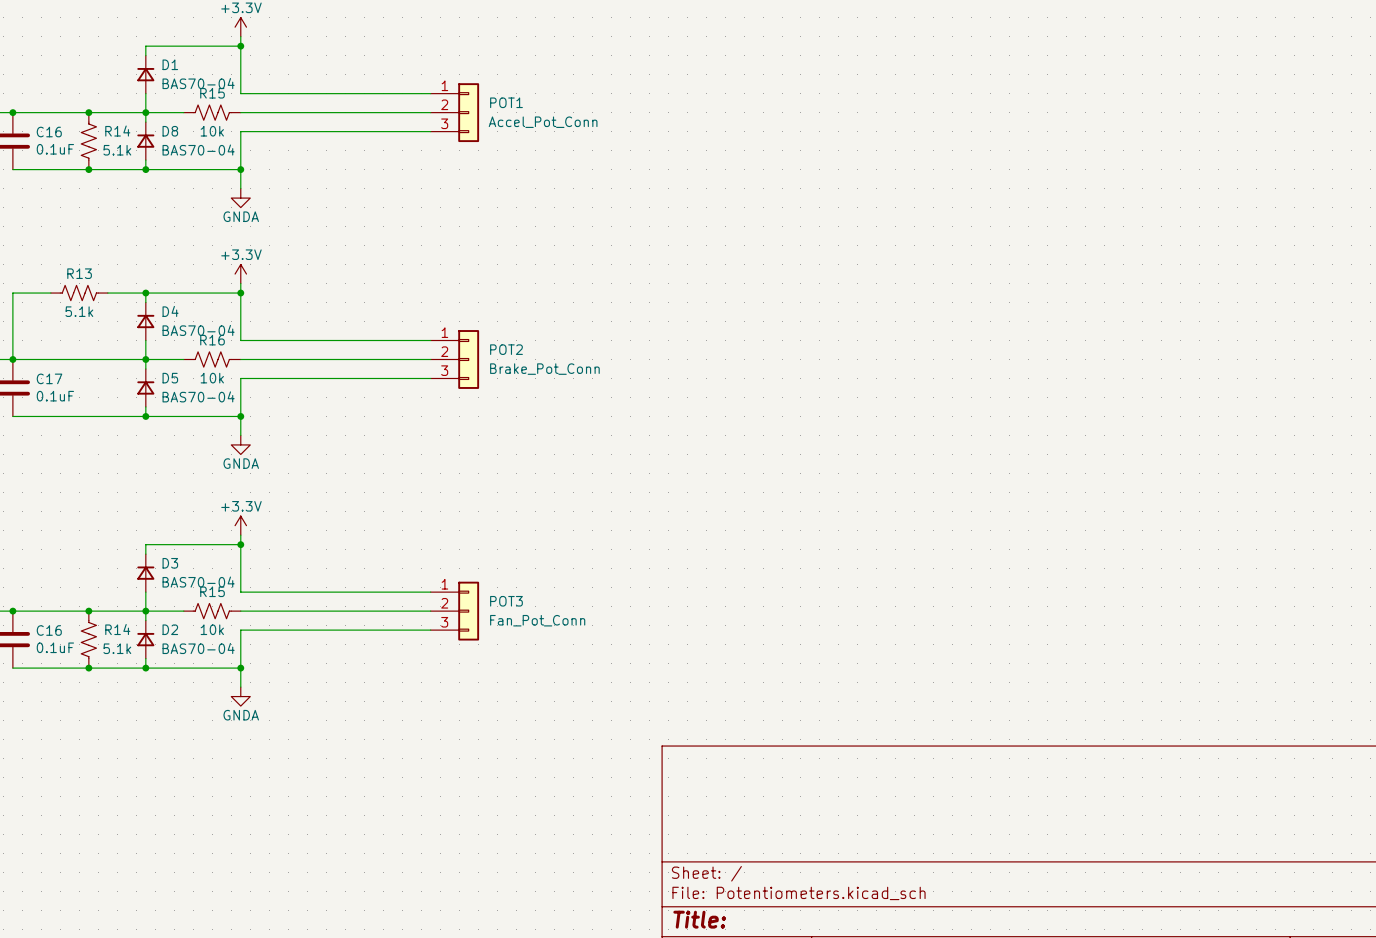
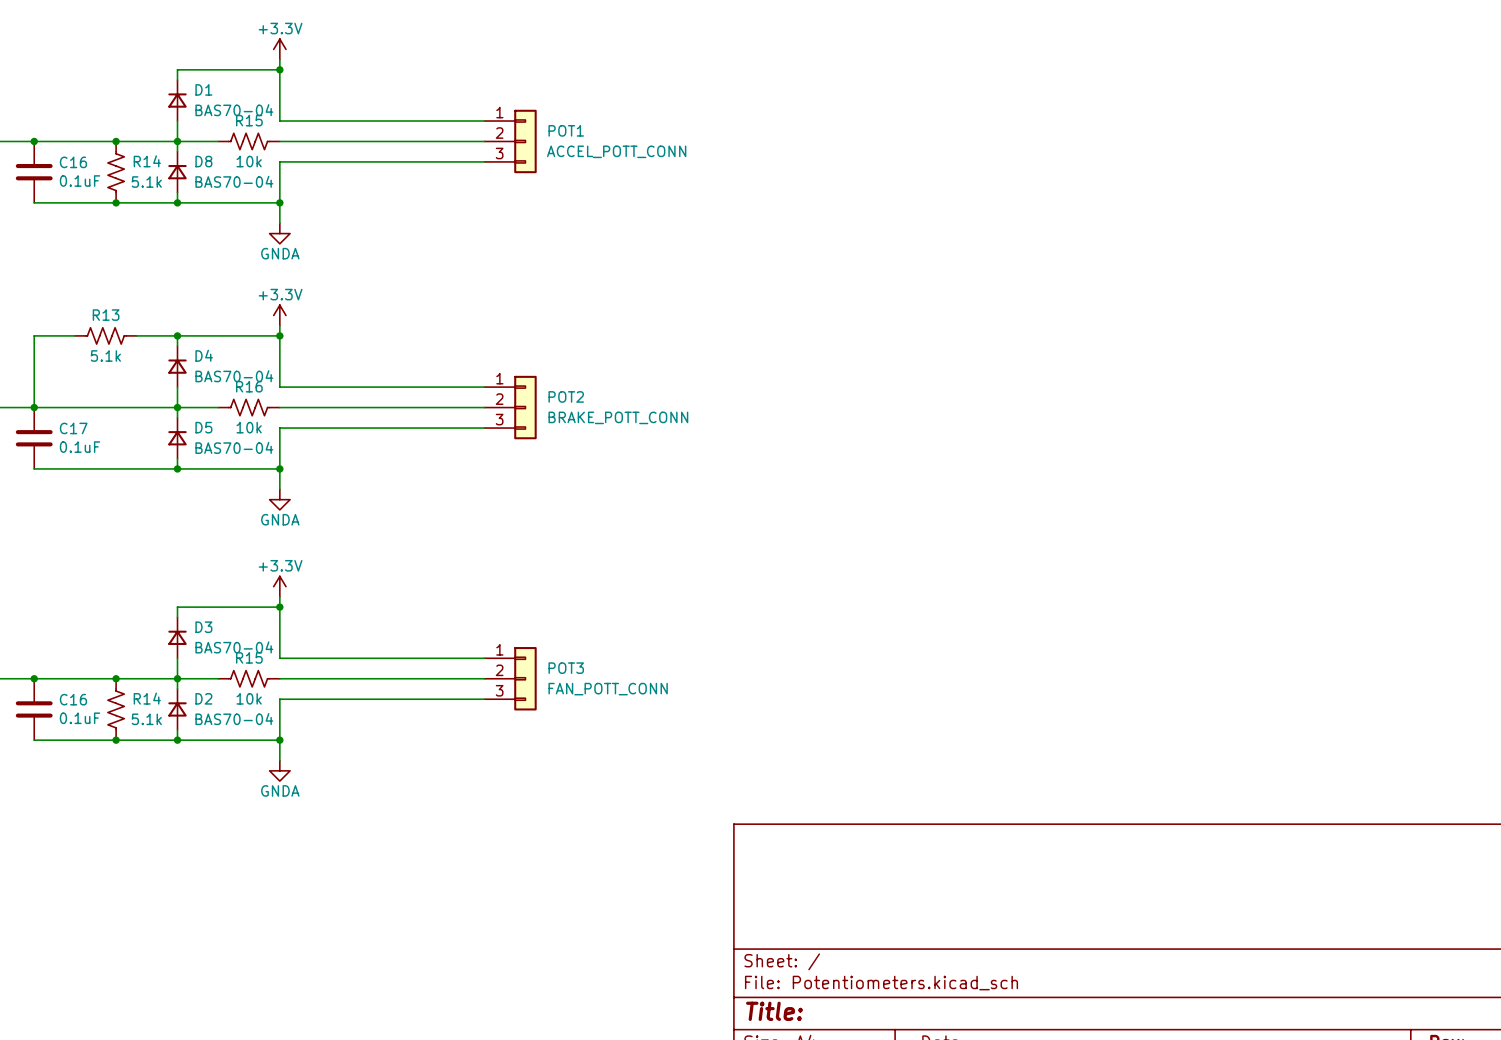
POT1 value: Accel_Pot_Conn (543, 122) -> ACCEL_POTT_CONN (616, 151)
POT2 value: Brake_Pot_Conn (544, 369) -> BRAKE_POTT_CONN (618, 417)
POT3 value: Fan_Pot_Conn (537, 620) -> FAN_POTT_CONN (608, 689)

